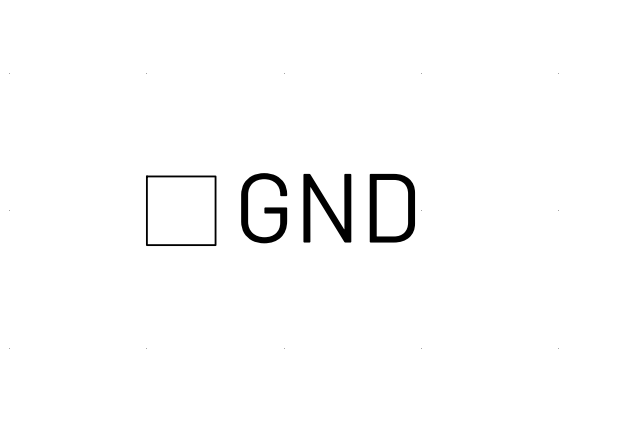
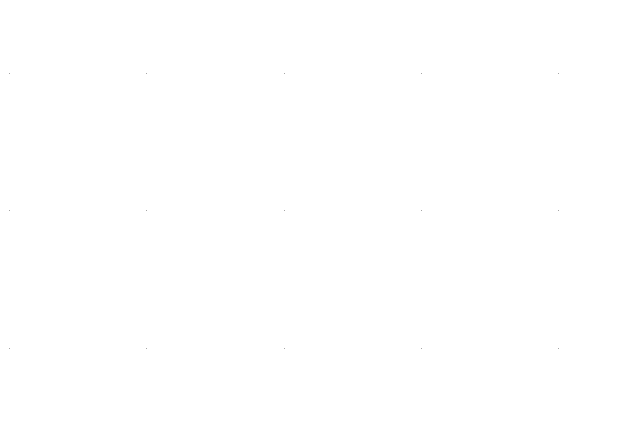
hierarchical label: GND (328, 208) -> none

